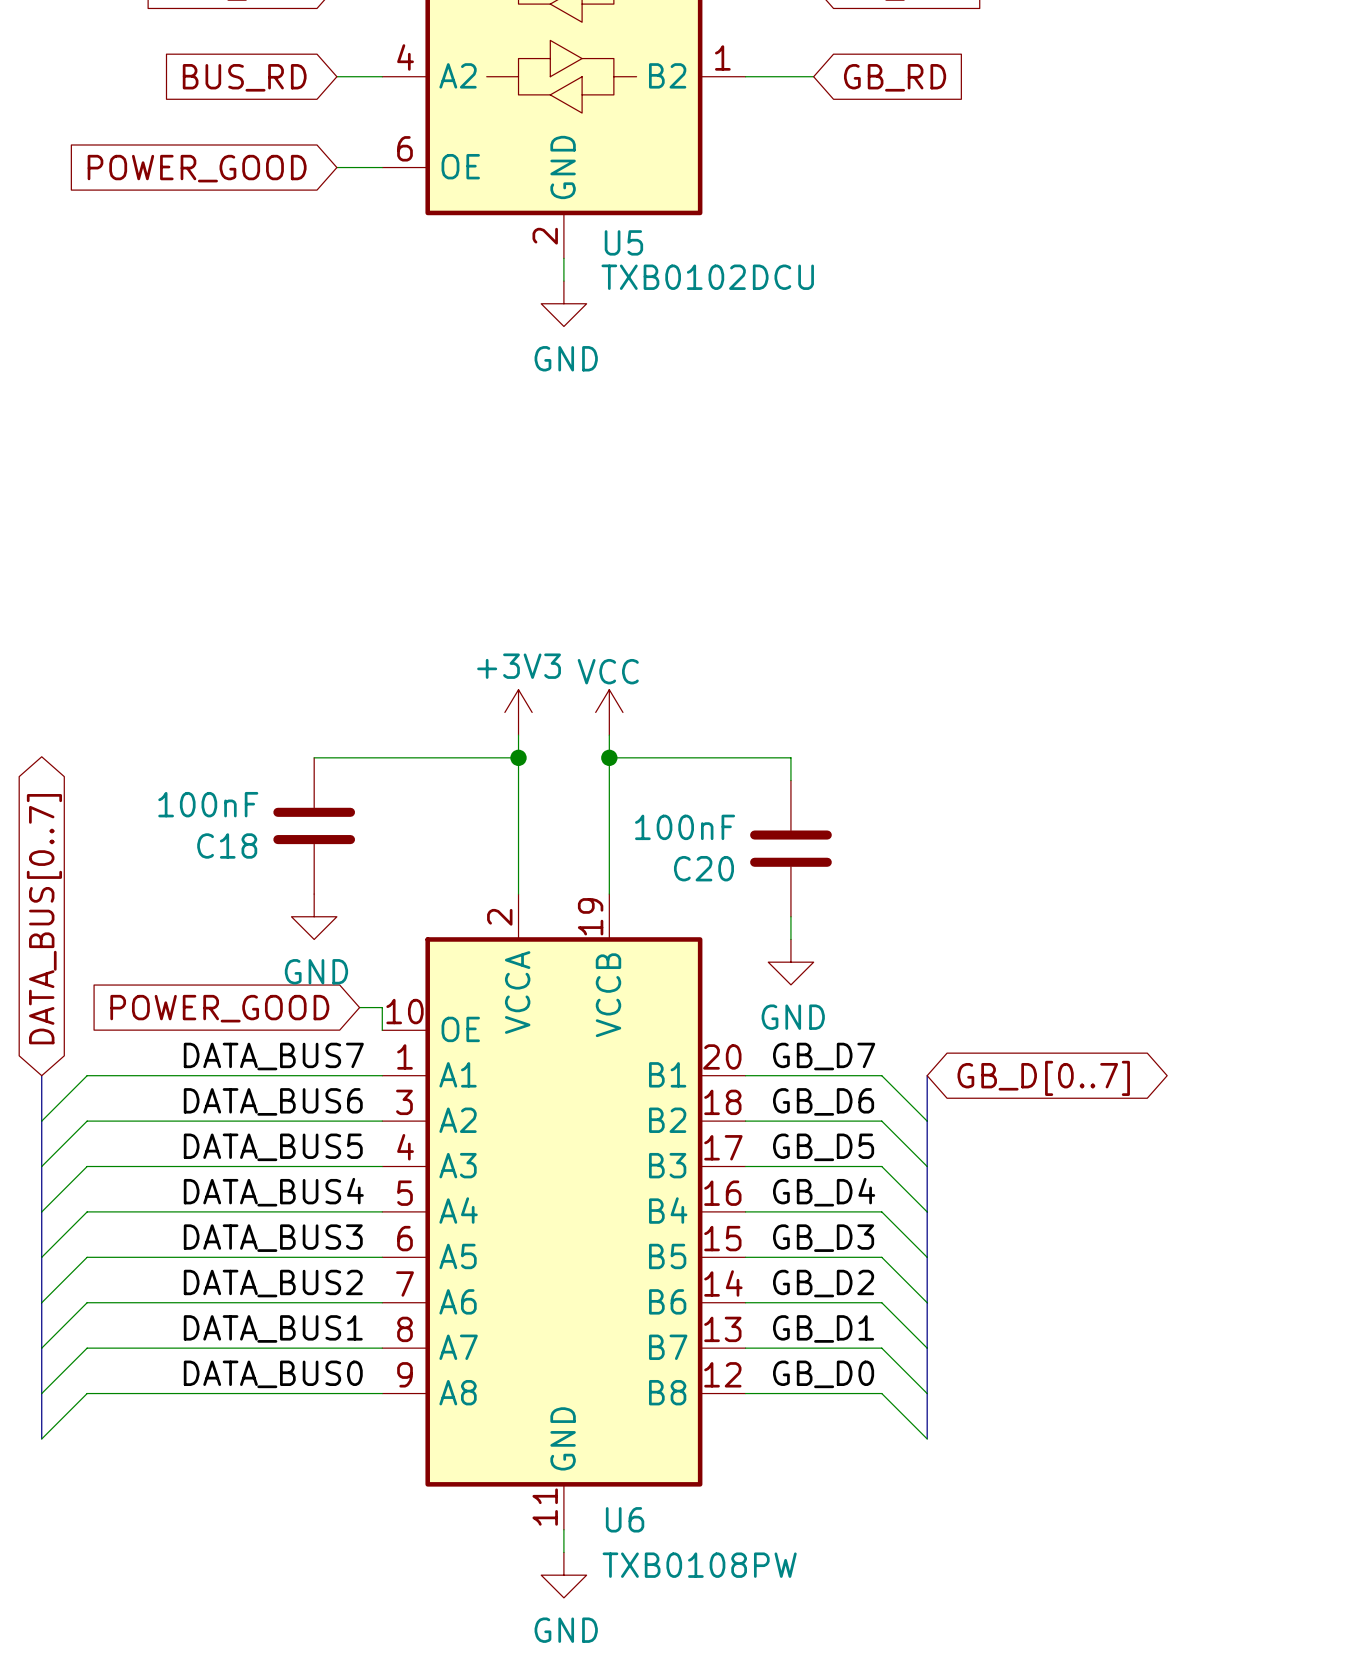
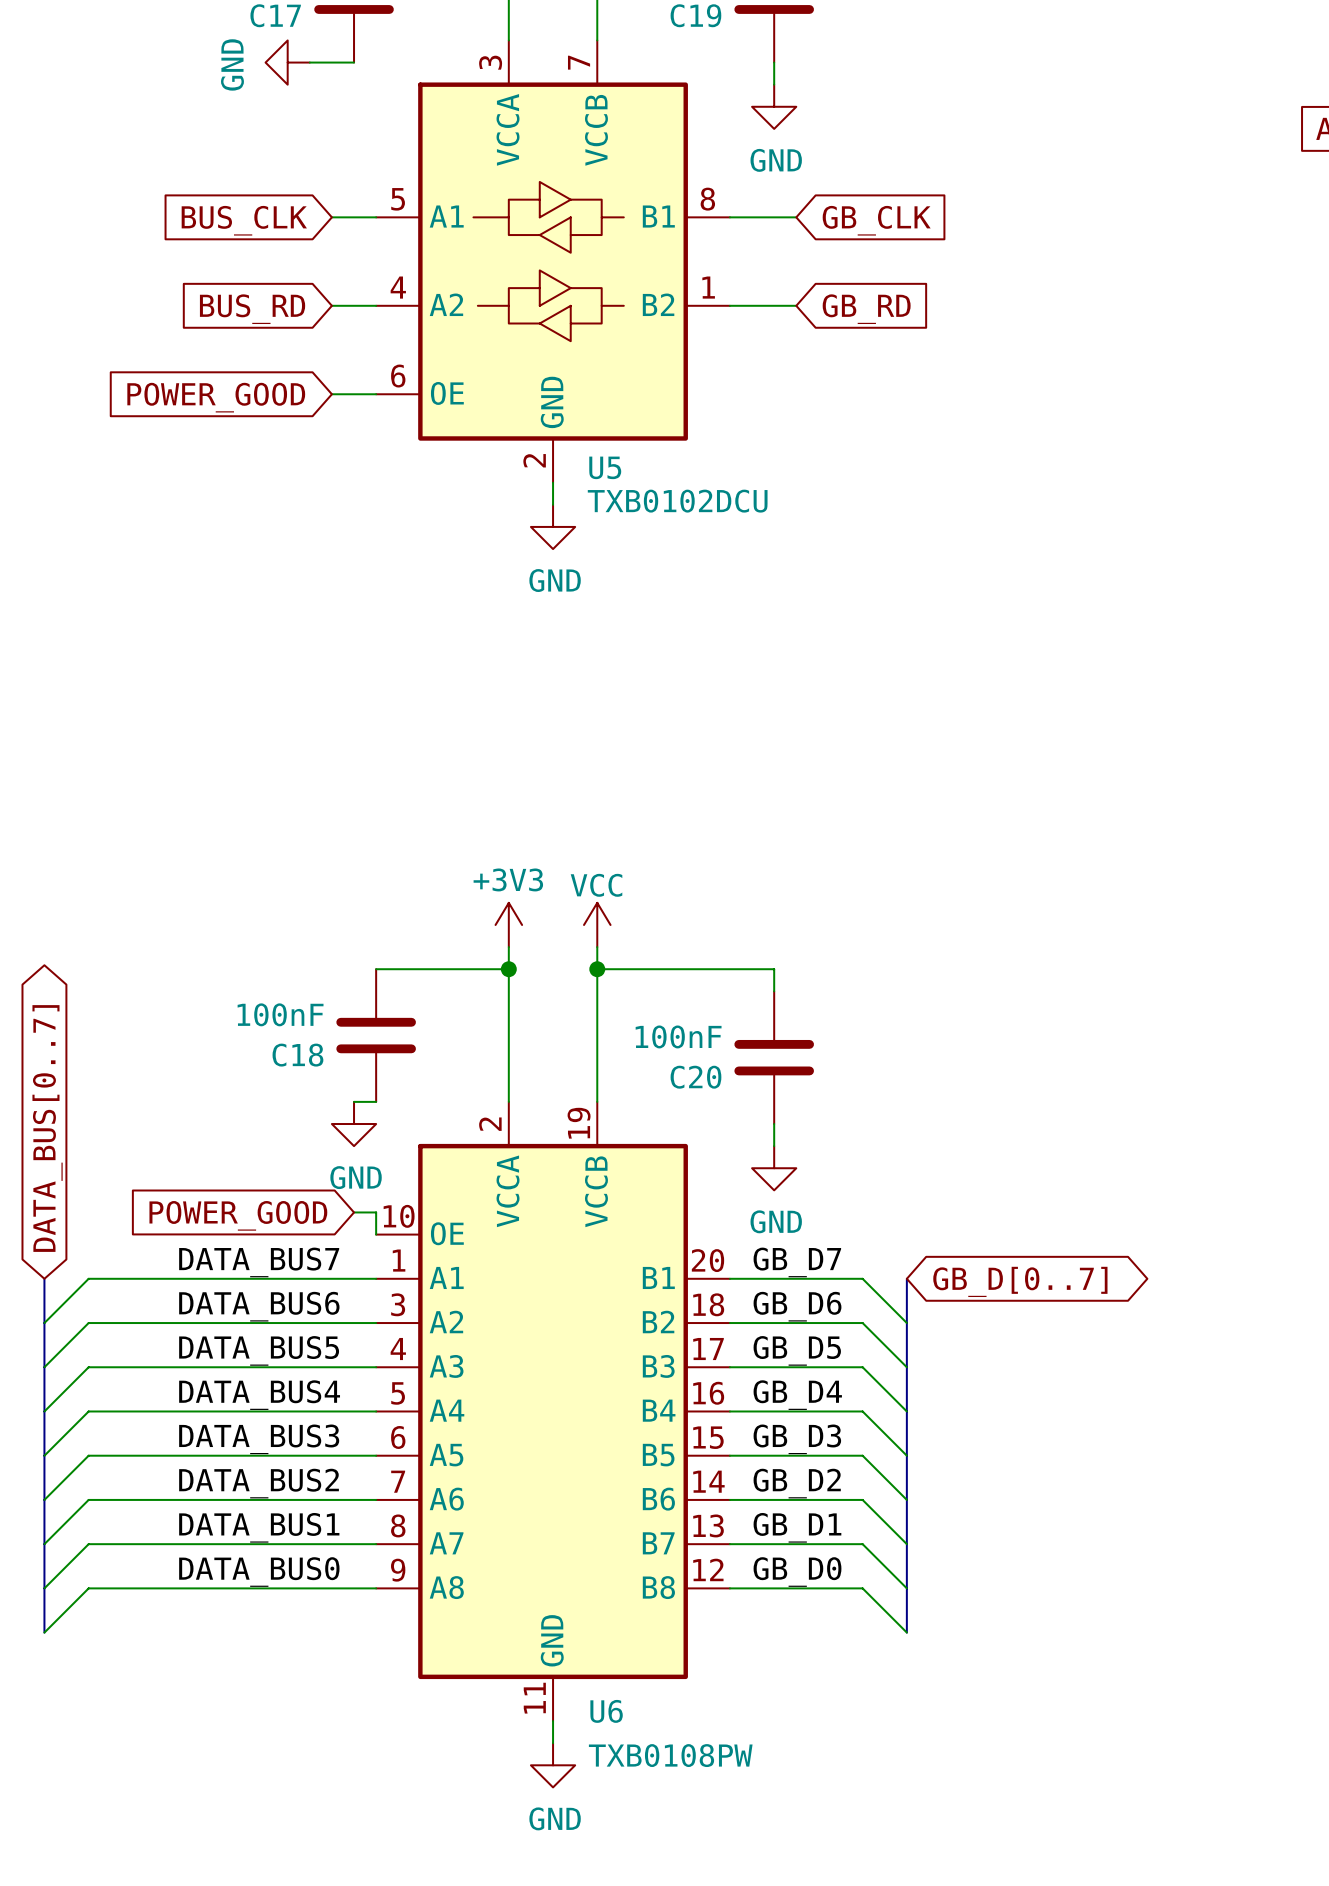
wire: (314, 757) (382, 757) -> none
C18 position: (314, 825) -> (376, 1035)
wire: none -> (354, 1101) (376, 1101)
power symbol position: GND (314, 916) -> GND (354, 1124)

